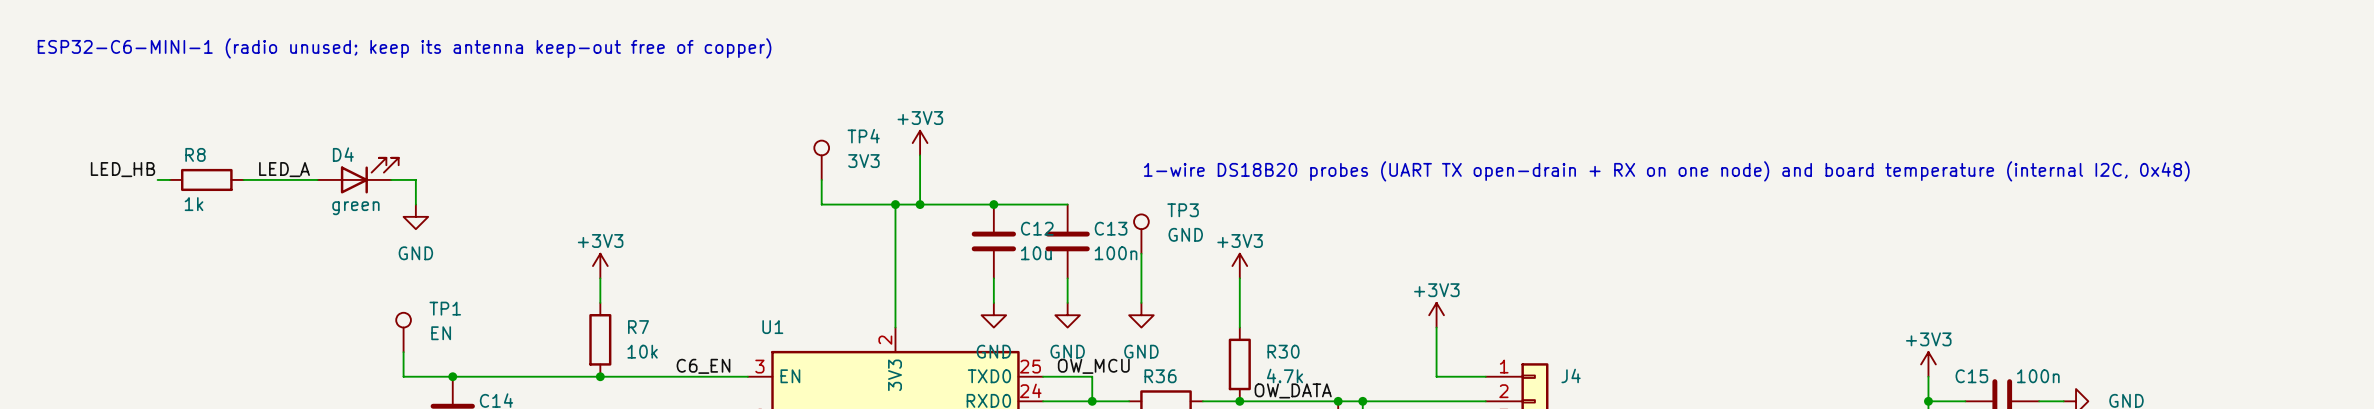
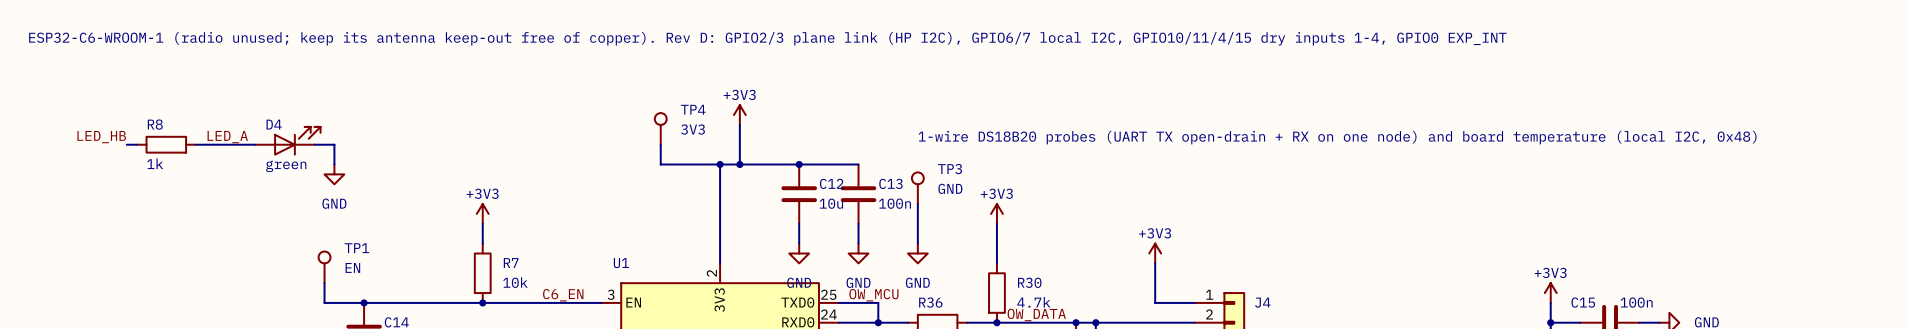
text: ESP32-C6-MINI-1 (radio unused; keep its antenna keep-out free of copper) (404, 48) -> ESP32-C6-WROOM-1 (radio unused; keep its antenna keep-out free of copper). Rev D: GPIO2/3 plane link (HP I2C), GPIO6/7 local I2C, GPIO10/11/4/15 dry inputs 1-4, GPIO0 EXP_INT (767, 38)
text: 1-wire DS18B20 probes (UART TX open-drain + RX on one node) and board temperature (internal I2C, 0x48) (1666, 171) -> 1-wire DS18B20 probes (UART TX open-drain + RX on one node) and board temperature (local I2C, 0x48) (1337, 137)

